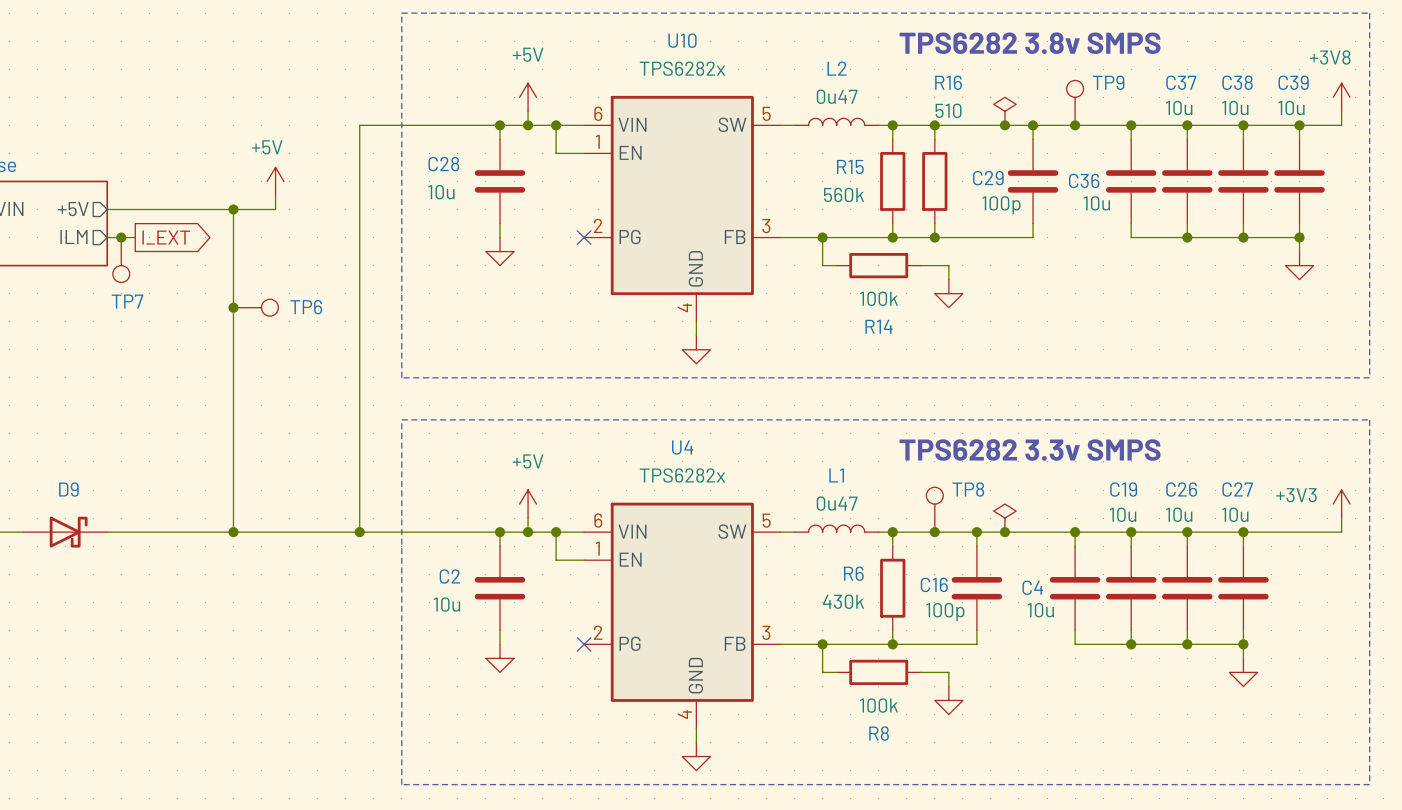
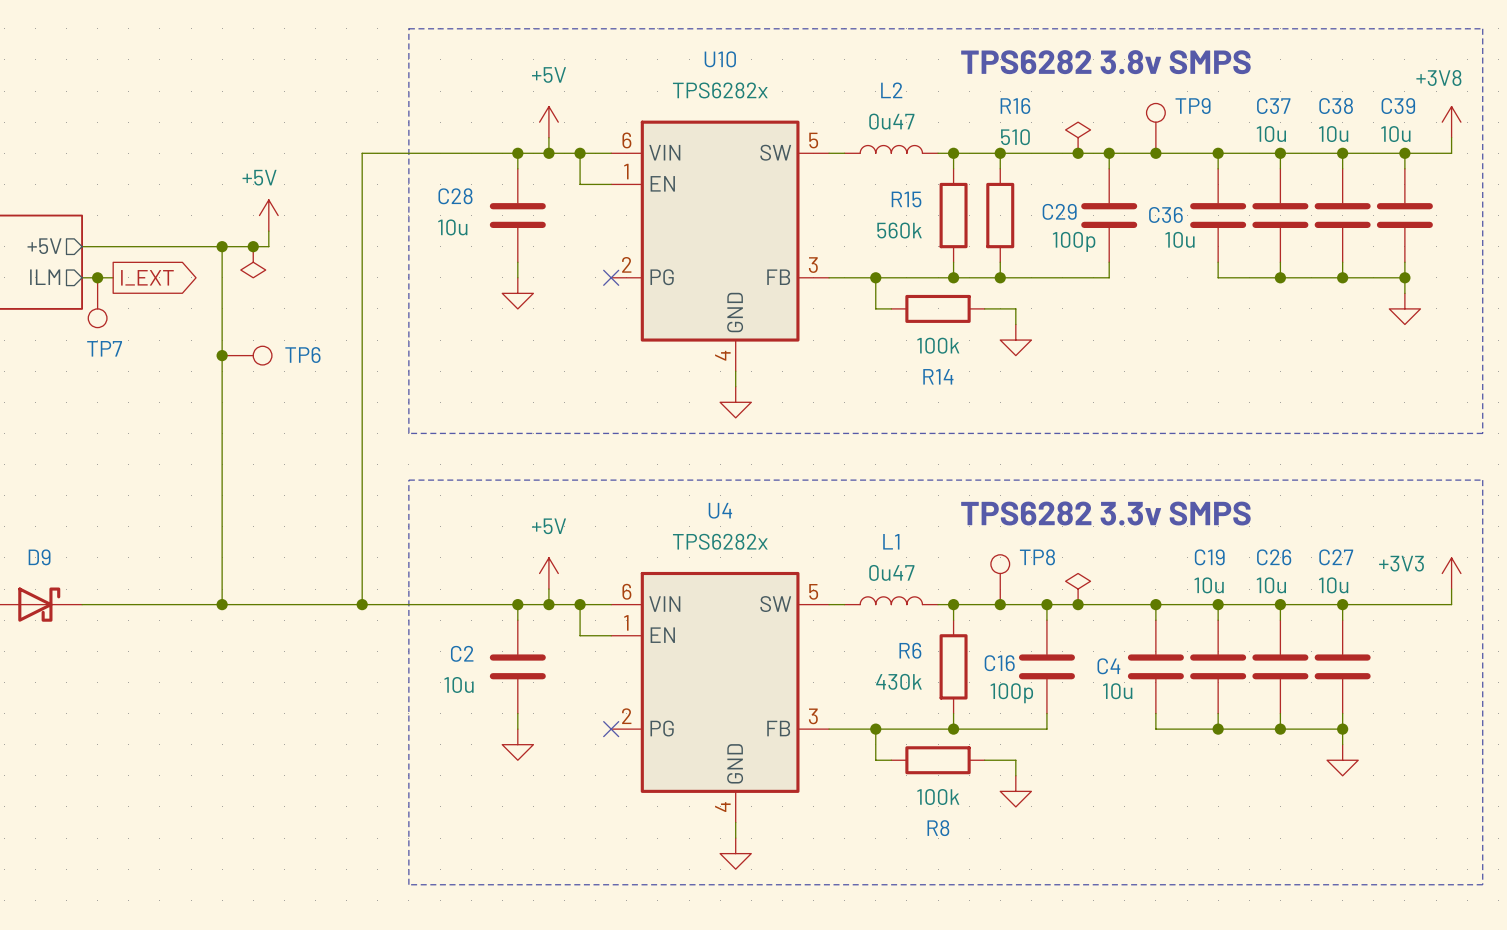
junction: none -> (253, 246)
power symbol: none -> (253, 262)

